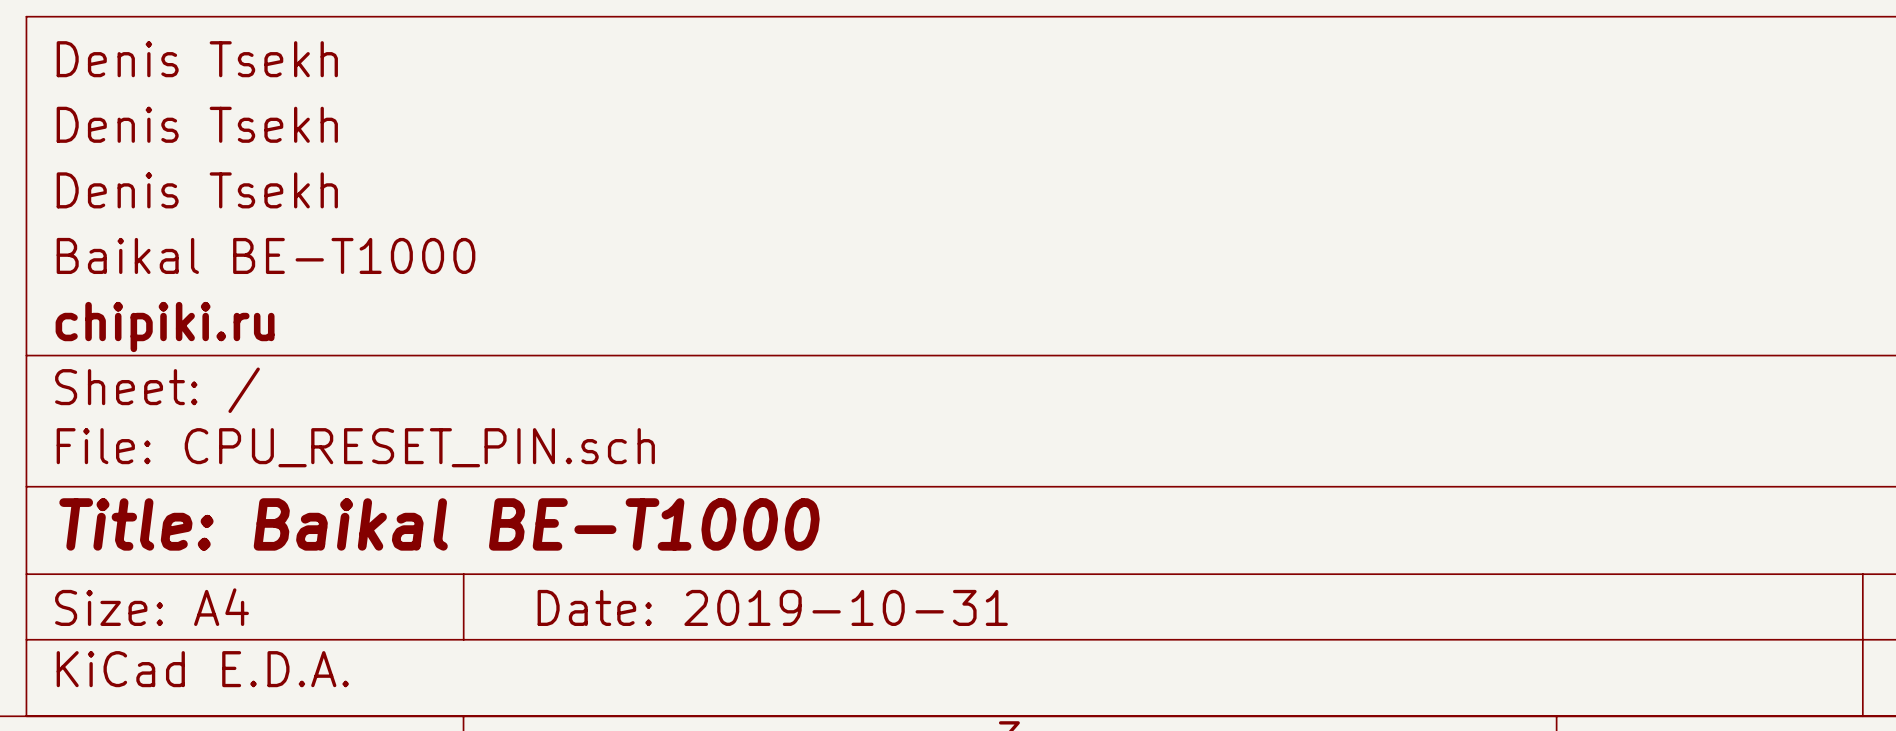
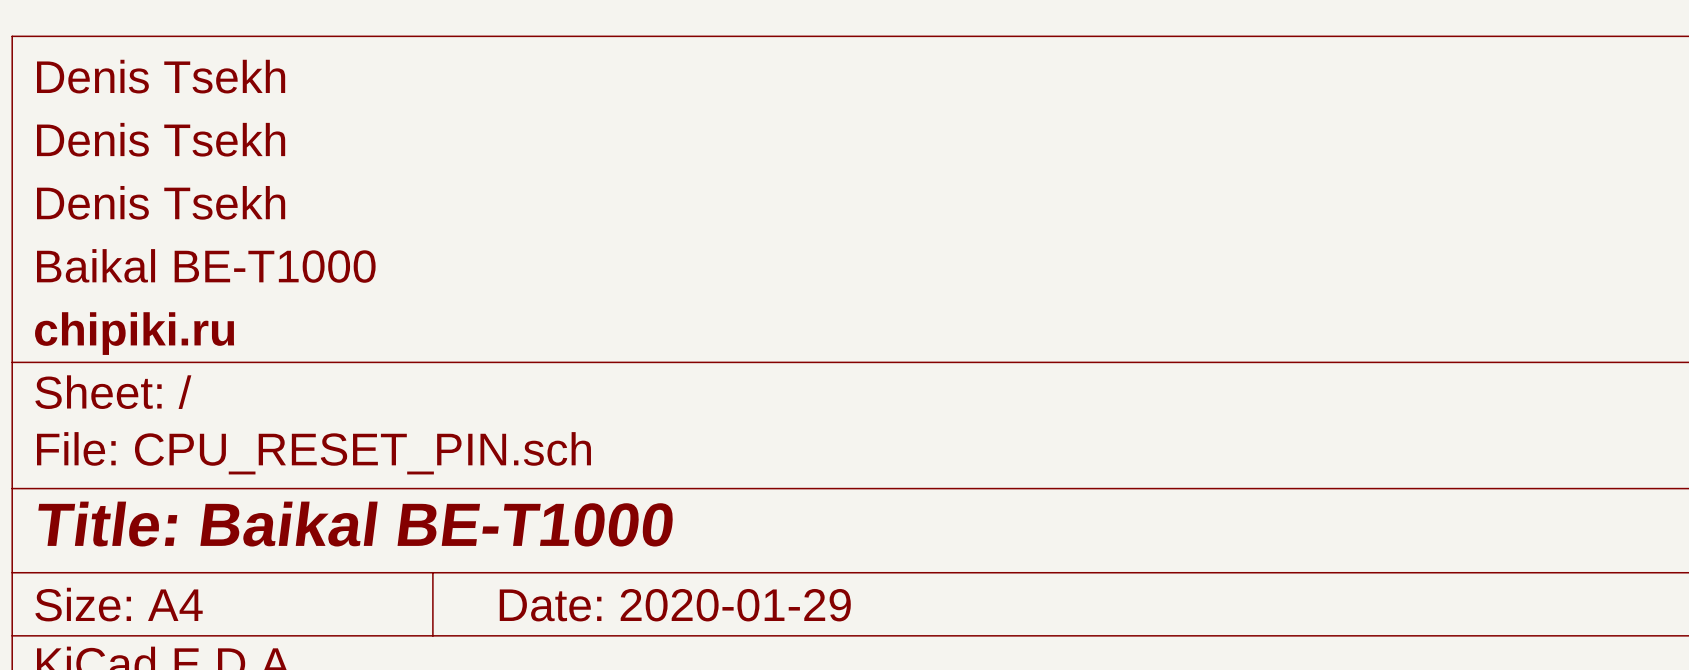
title block: Date: 2019-10-31 (772, 607) -> Date: 2020-01-29 (675, 605)

